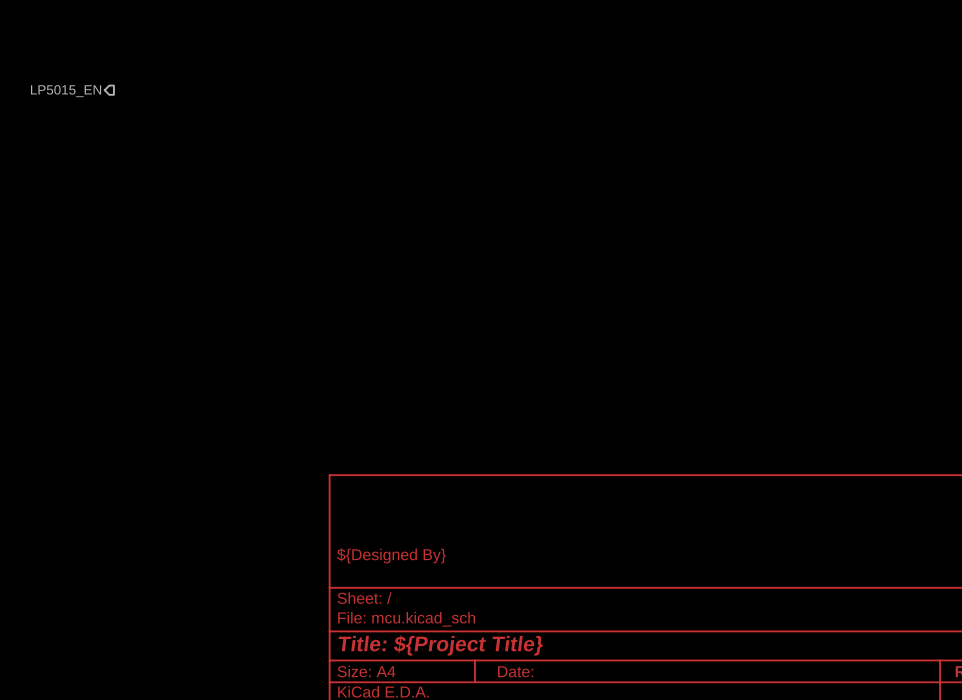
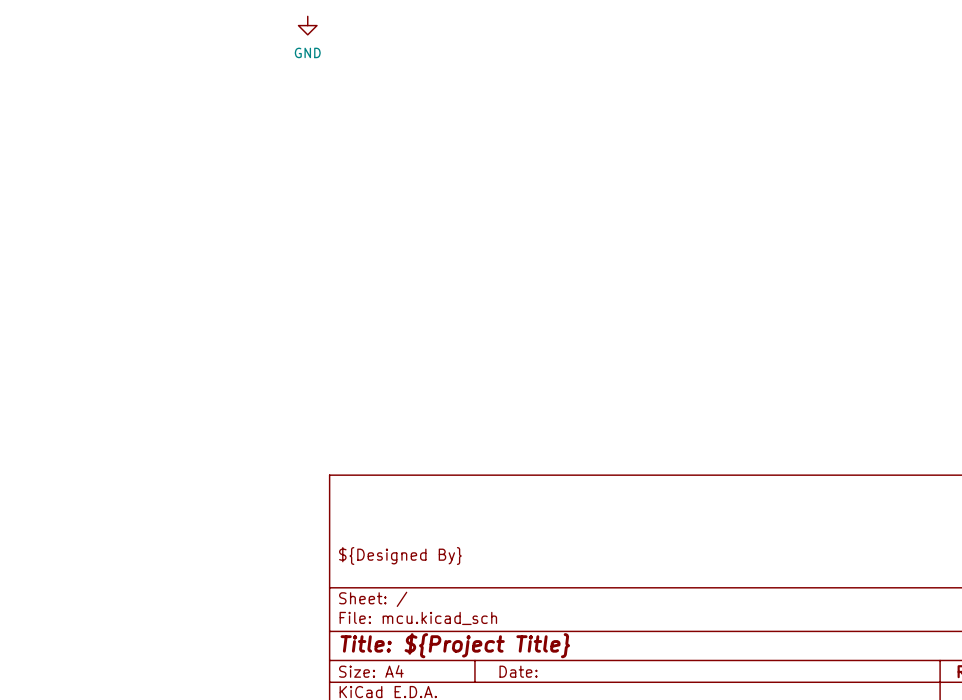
power symbol: none -> GND (307, 25)
hierarchical label: LP5015_EN (66, 91) -> none

